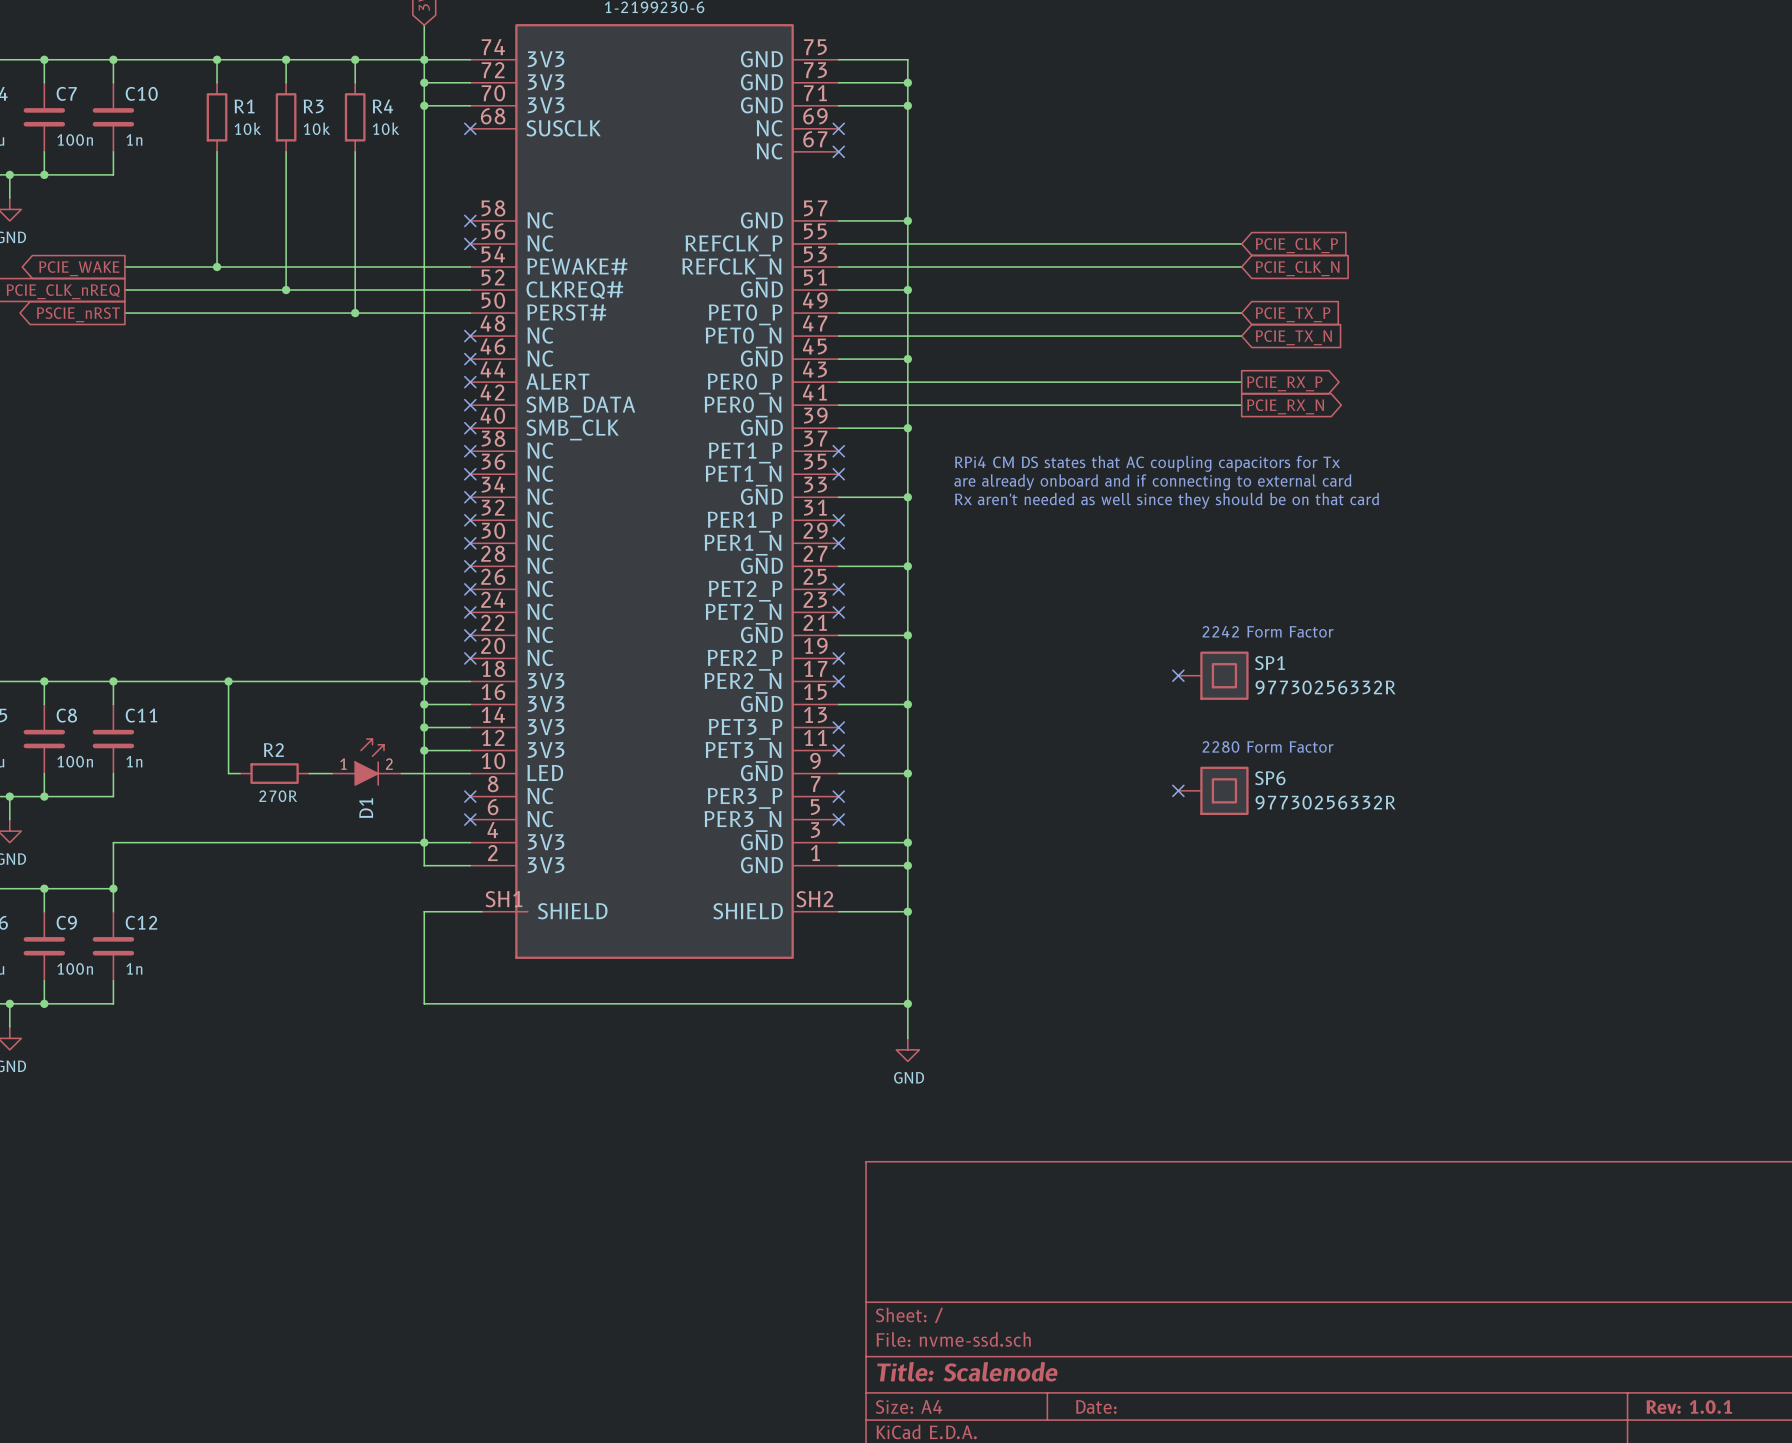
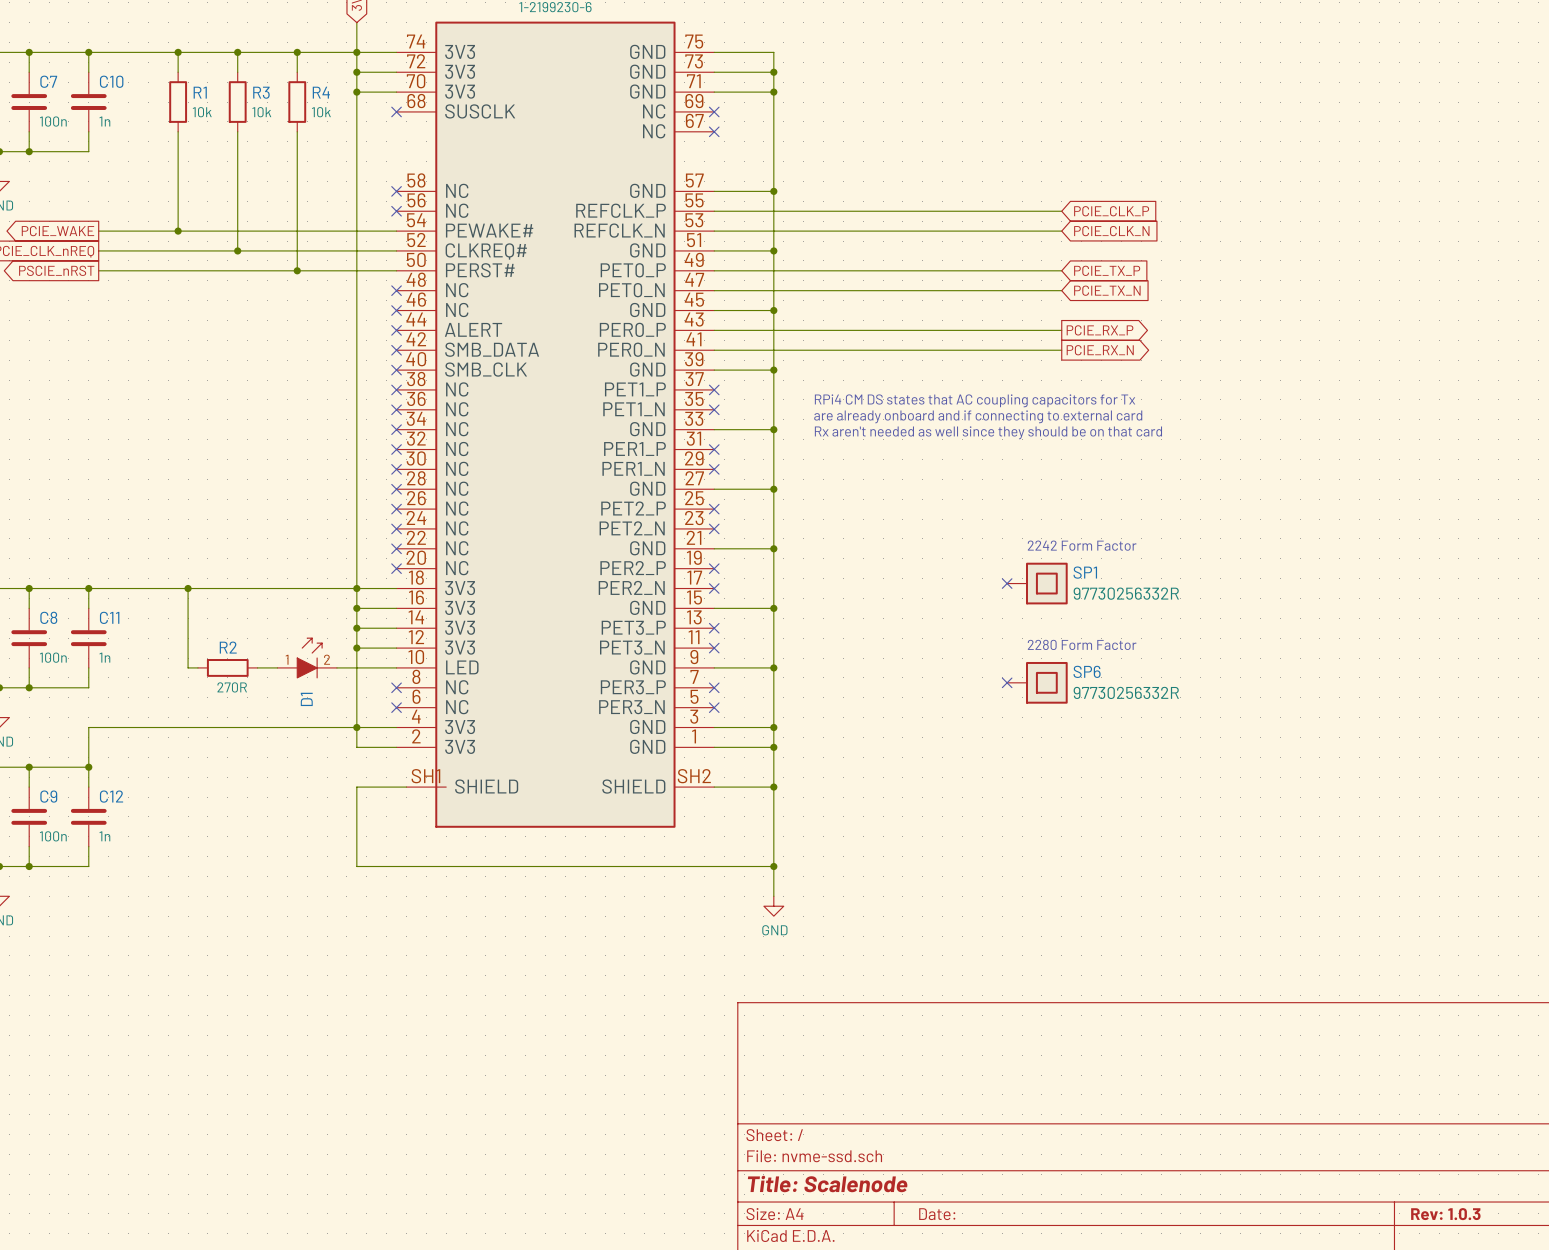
title block: Rev: 1.0.1 (1689, 1407) -> Rev: 1.0.3 (1445, 1214)

